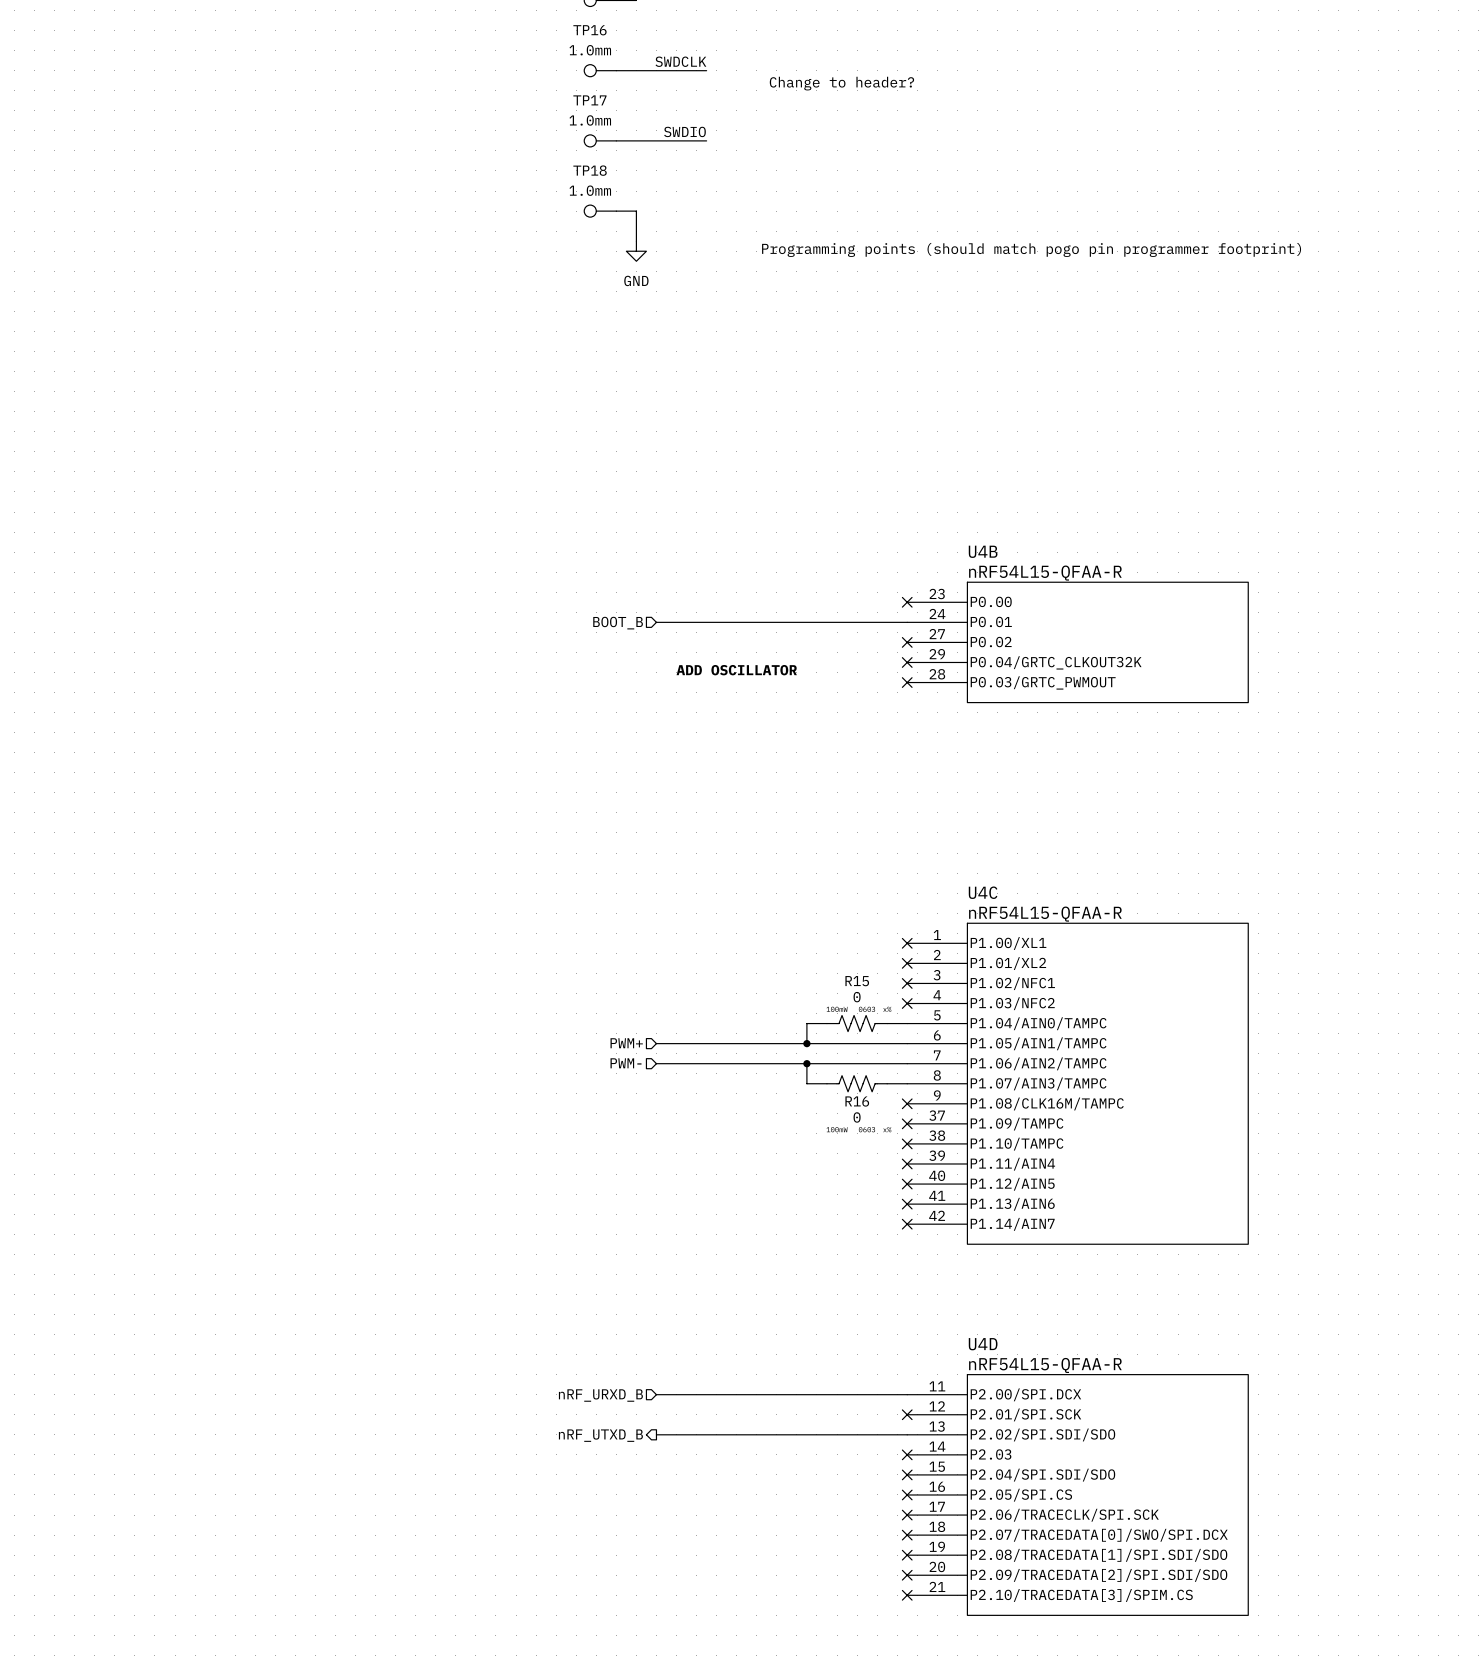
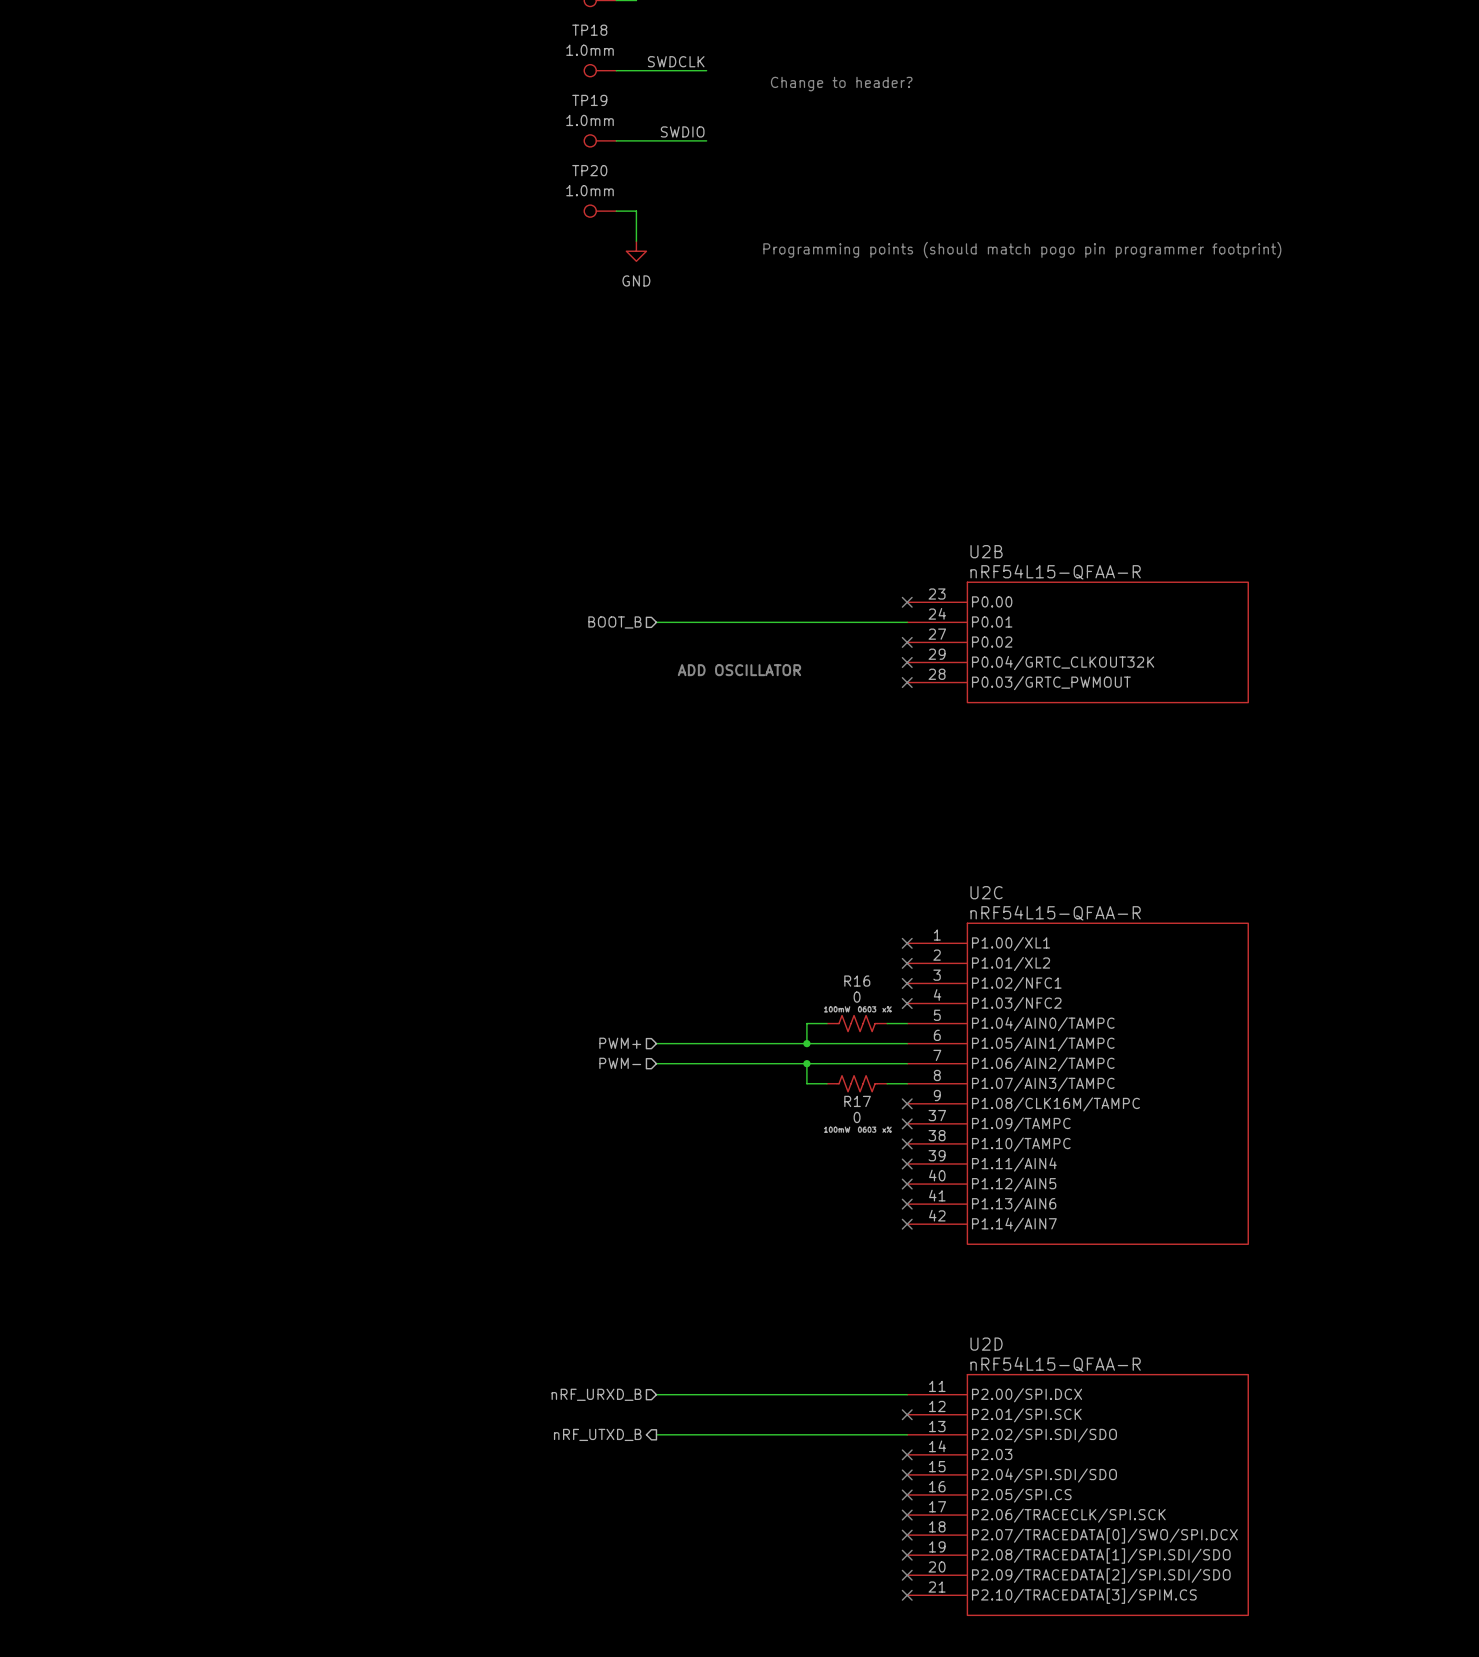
TP16 name: TP16 (589, 30) -> TP18 (589, 30)
TP17 name: TP17 (589, 100) -> TP19 (589, 100)
TP18 name: TP18 (590, 170) -> TP20 (589, 170)
U4B name: U4B (983, 551) -> U2B (986, 551)
U4C name: U4C (983, 892) -> U2C (986, 892)
R15 name: R15 (857, 981) -> R16 (857, 981)
R16 name: R16 (857, 1101) -> R17 (857, 1101)
U4D name: U4D (983, 1344) -> U2D (986, 1344)

